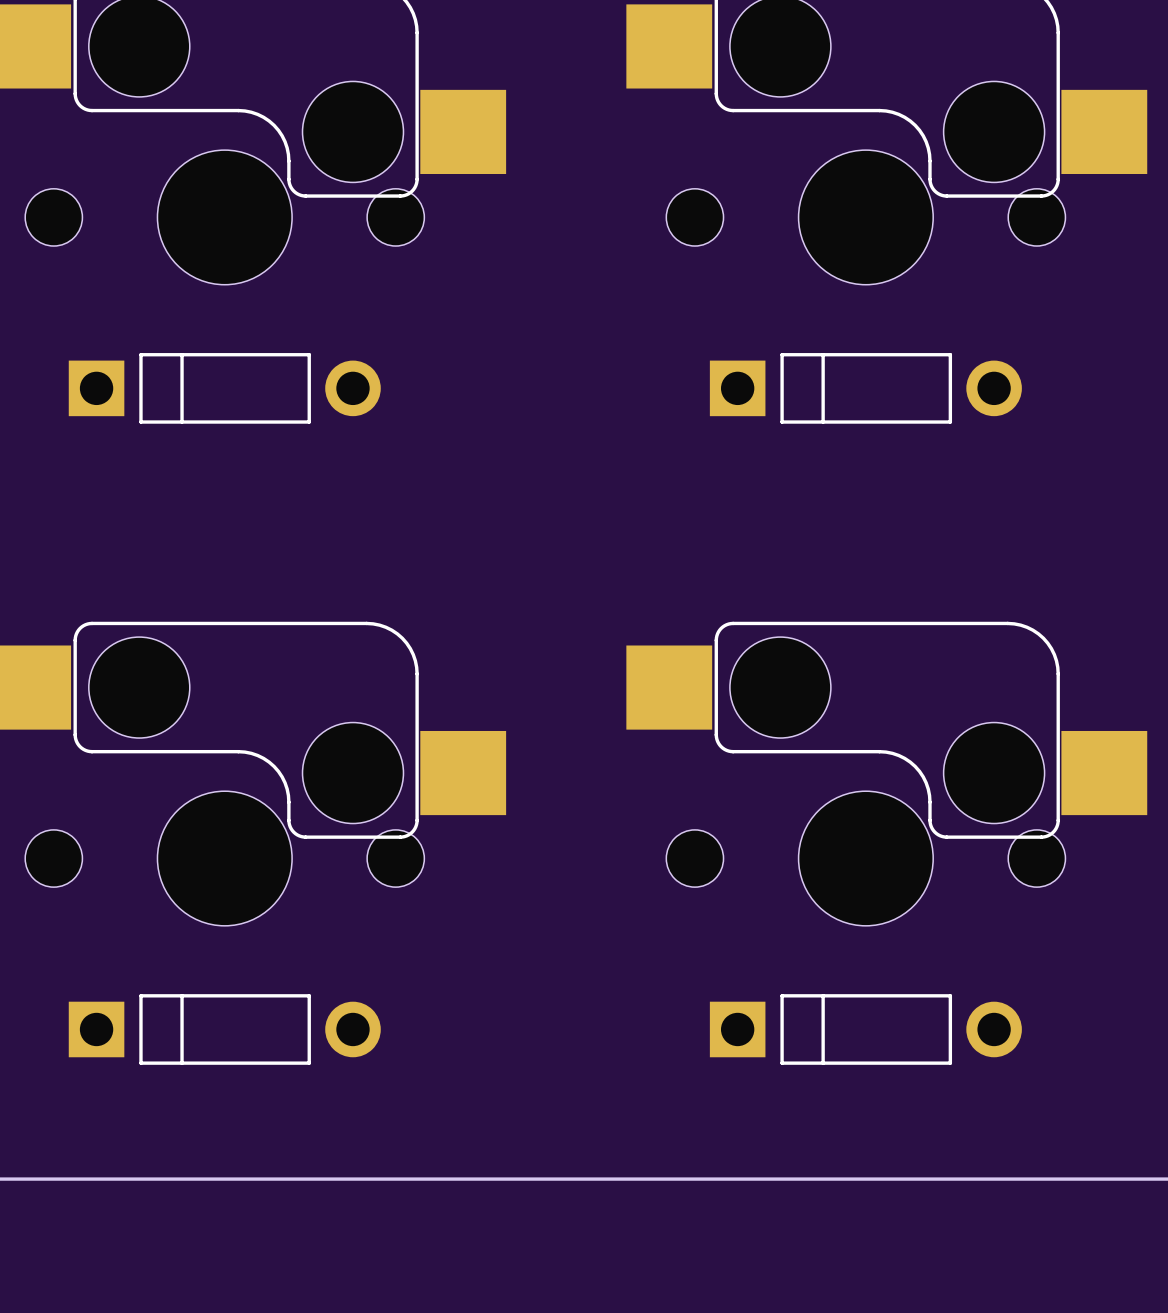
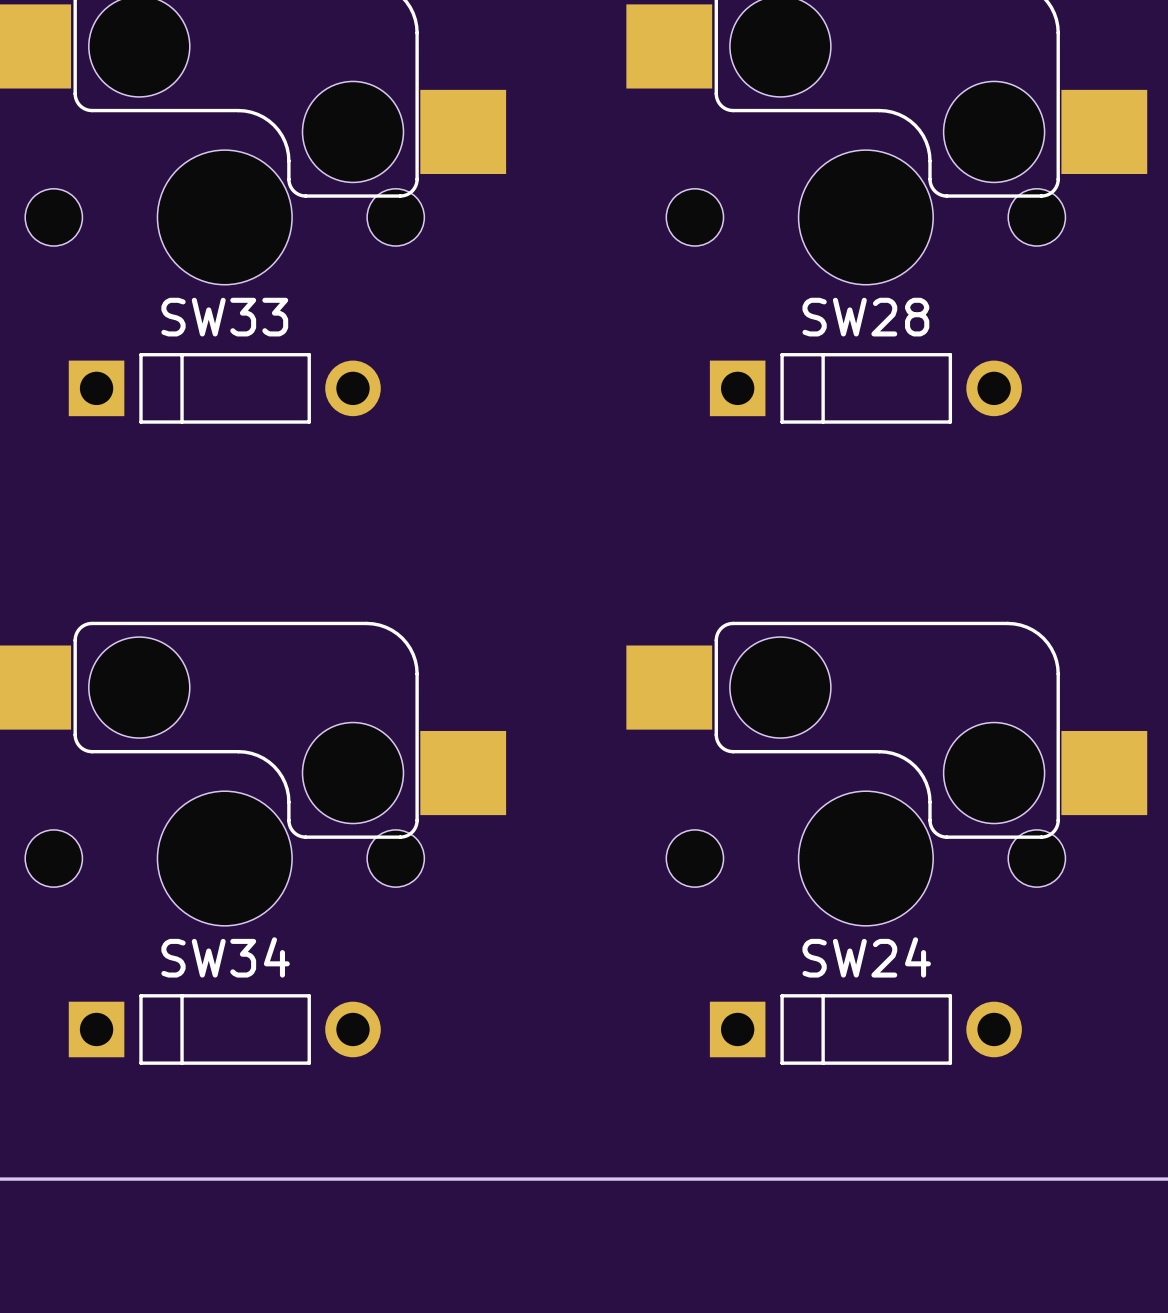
SW33 name: none -> SW33 (224, 317)
SW28 name: none -> SW28 (865, 317)
SW34 name: none -> SW34 (225, 957)
SW24 name: none -> SW24 (866, 957)

